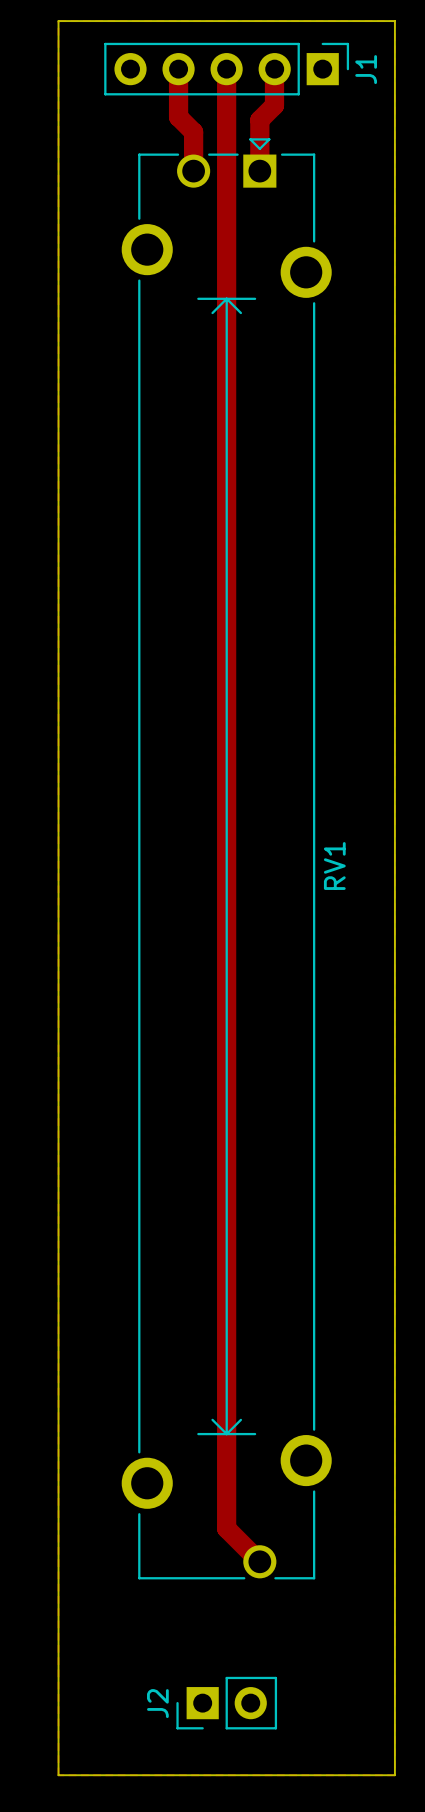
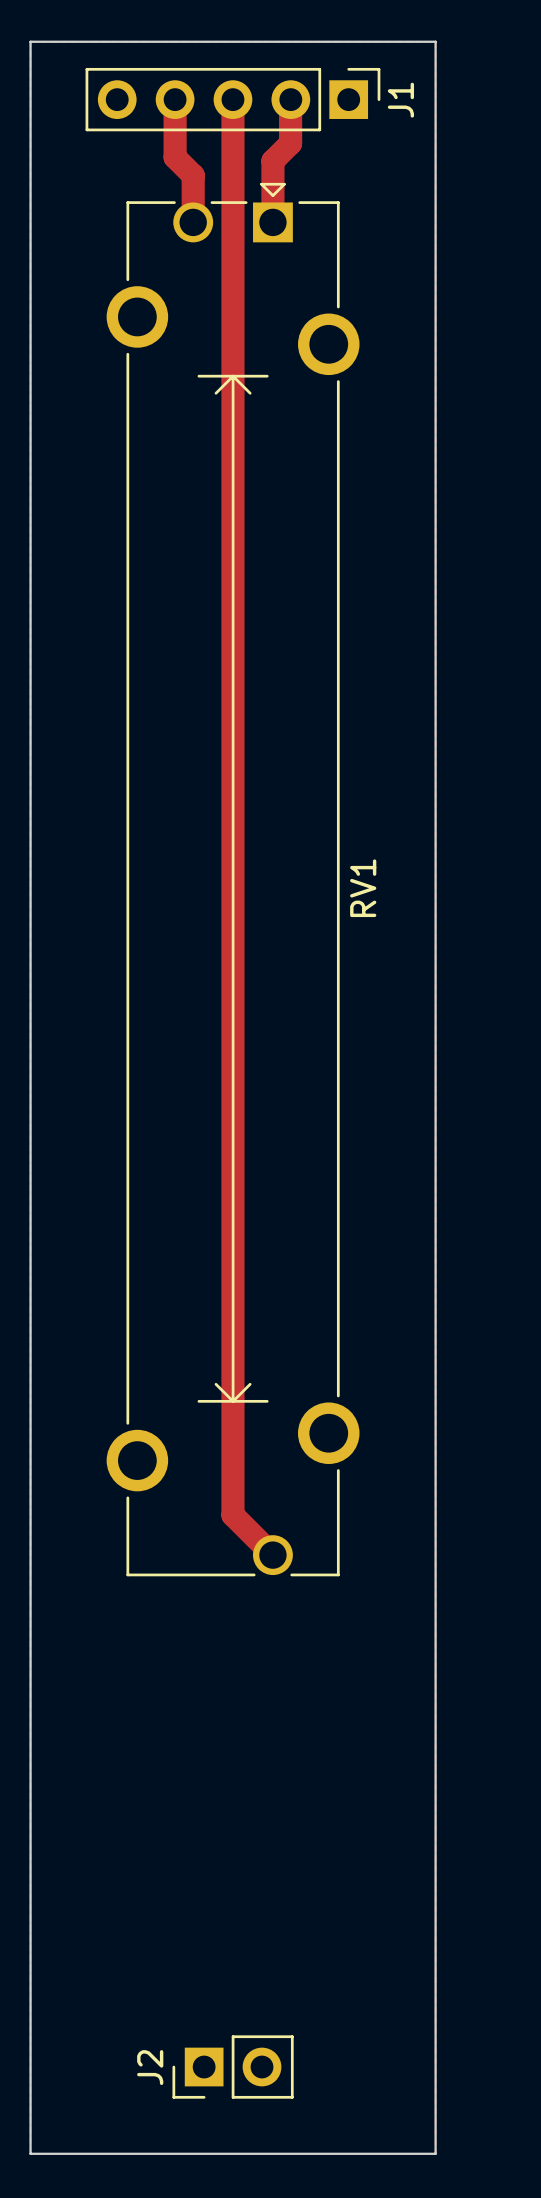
RV1 footprint: [121, 138, 332, 1580] -> [106, 182, 360, 1577]
track: (226, 1244) (226, 1528) (259, 1561) -> (232, 1515) (272, 1555)

